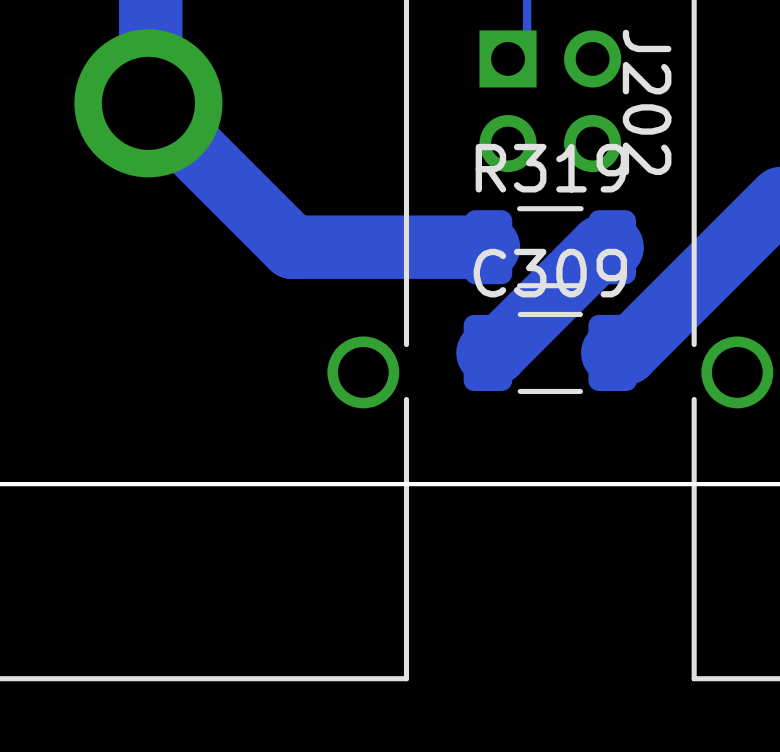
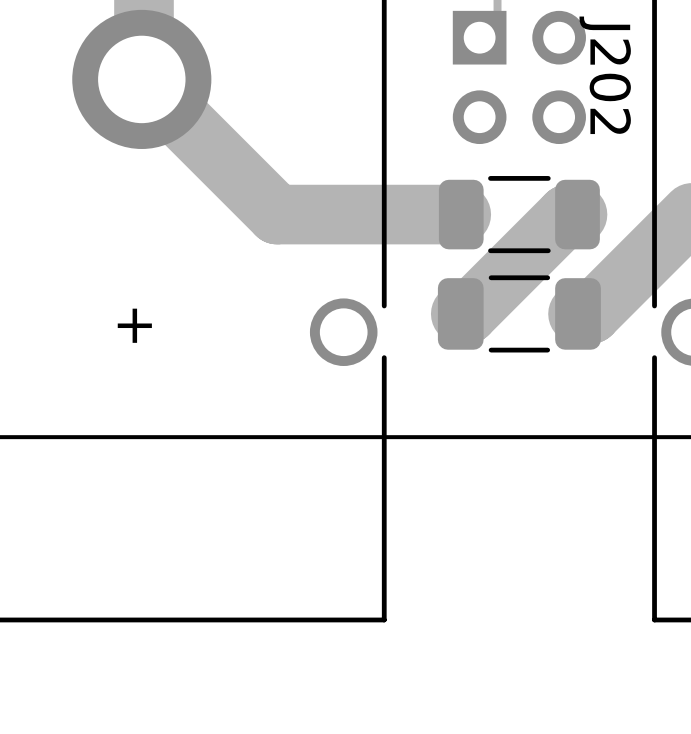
R319 name: R319 (551, 168) -> none
C309 name: C309 (550, 273) -> none
text: none -> + (134, 325)

